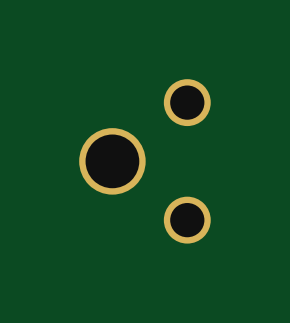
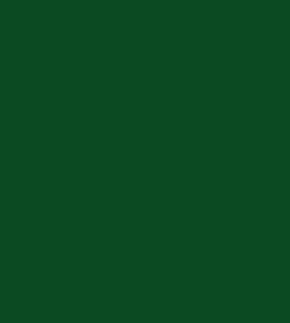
part: (144, 161) -> none

